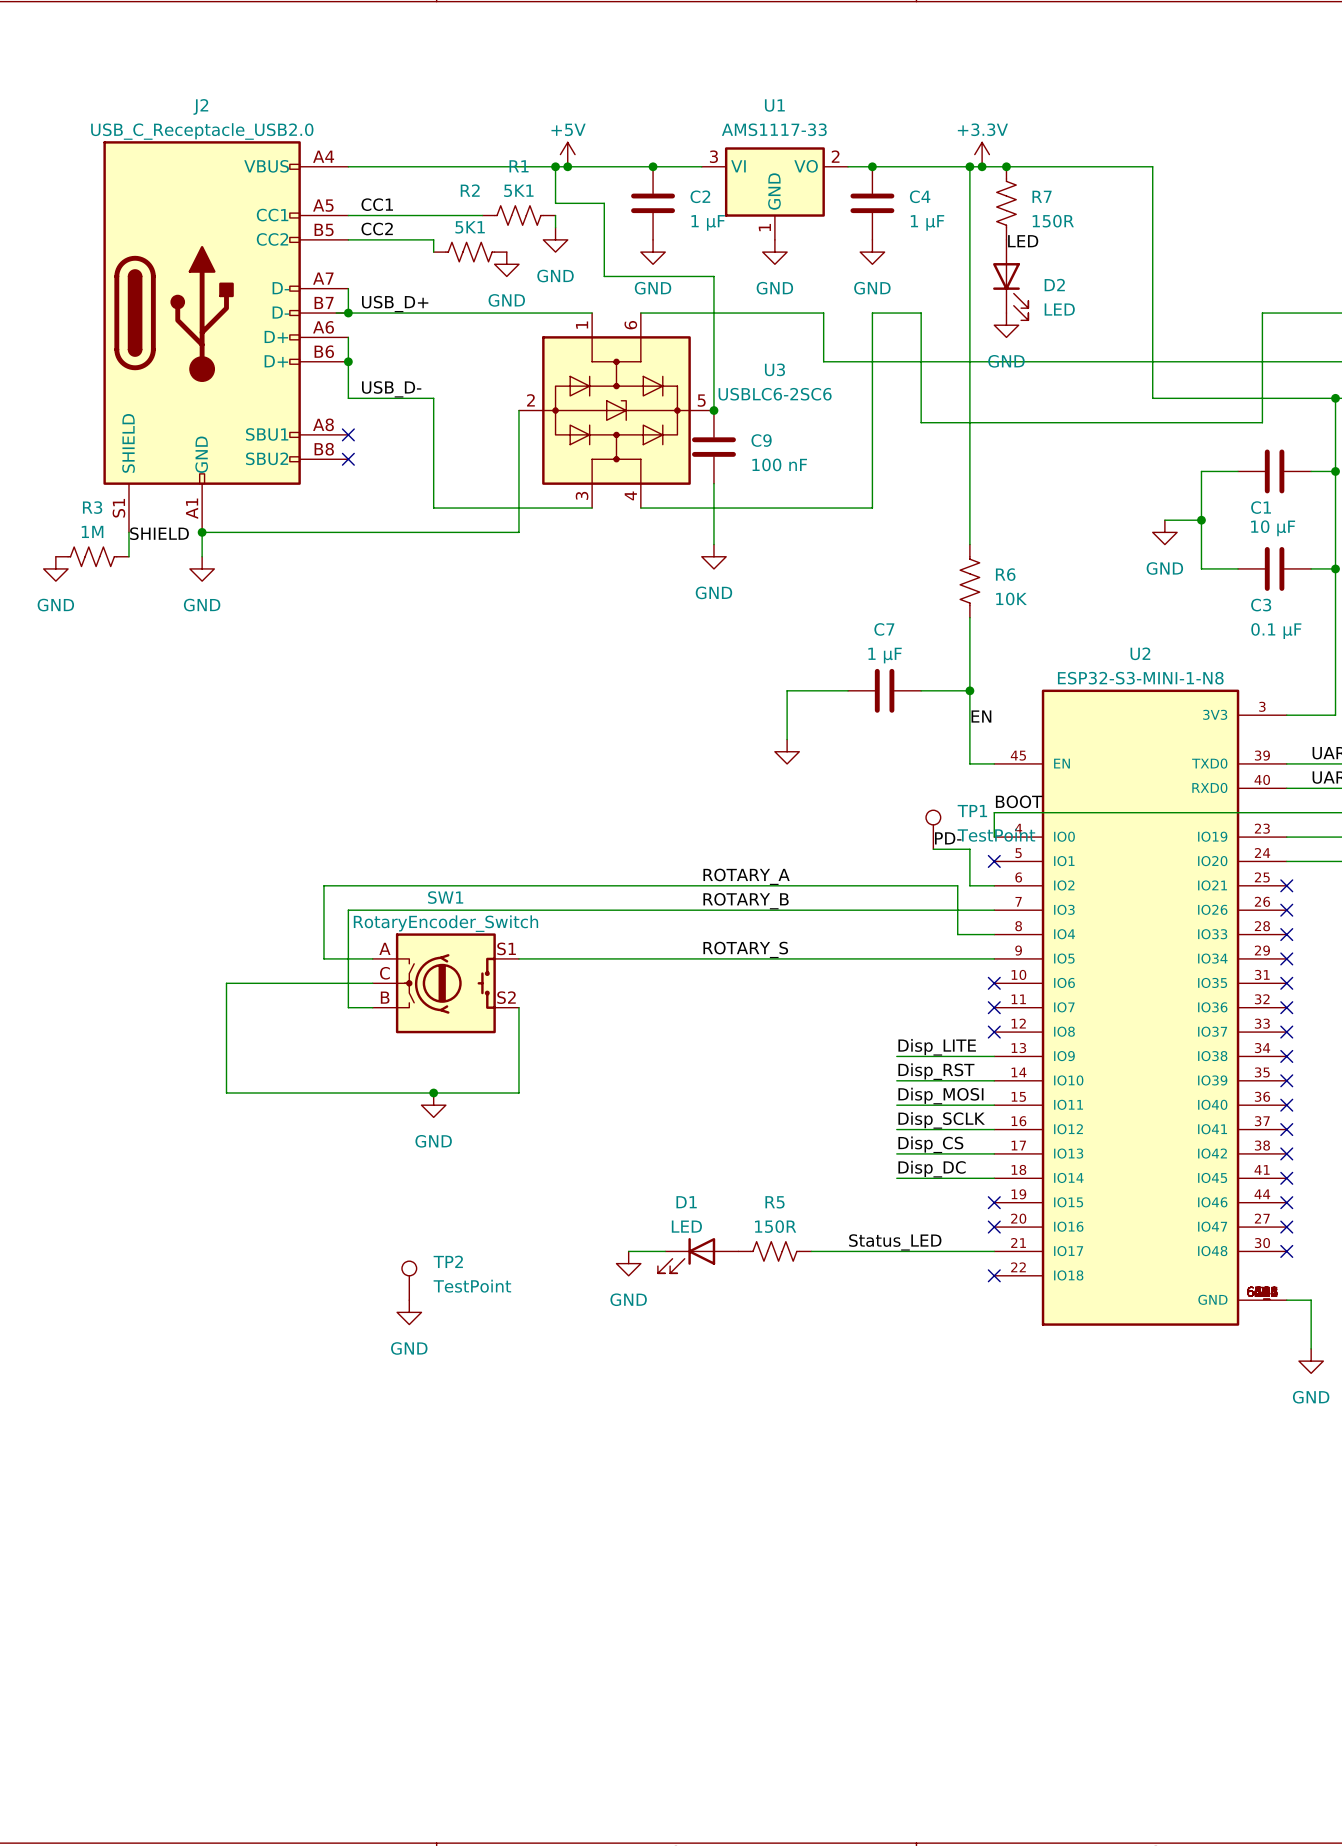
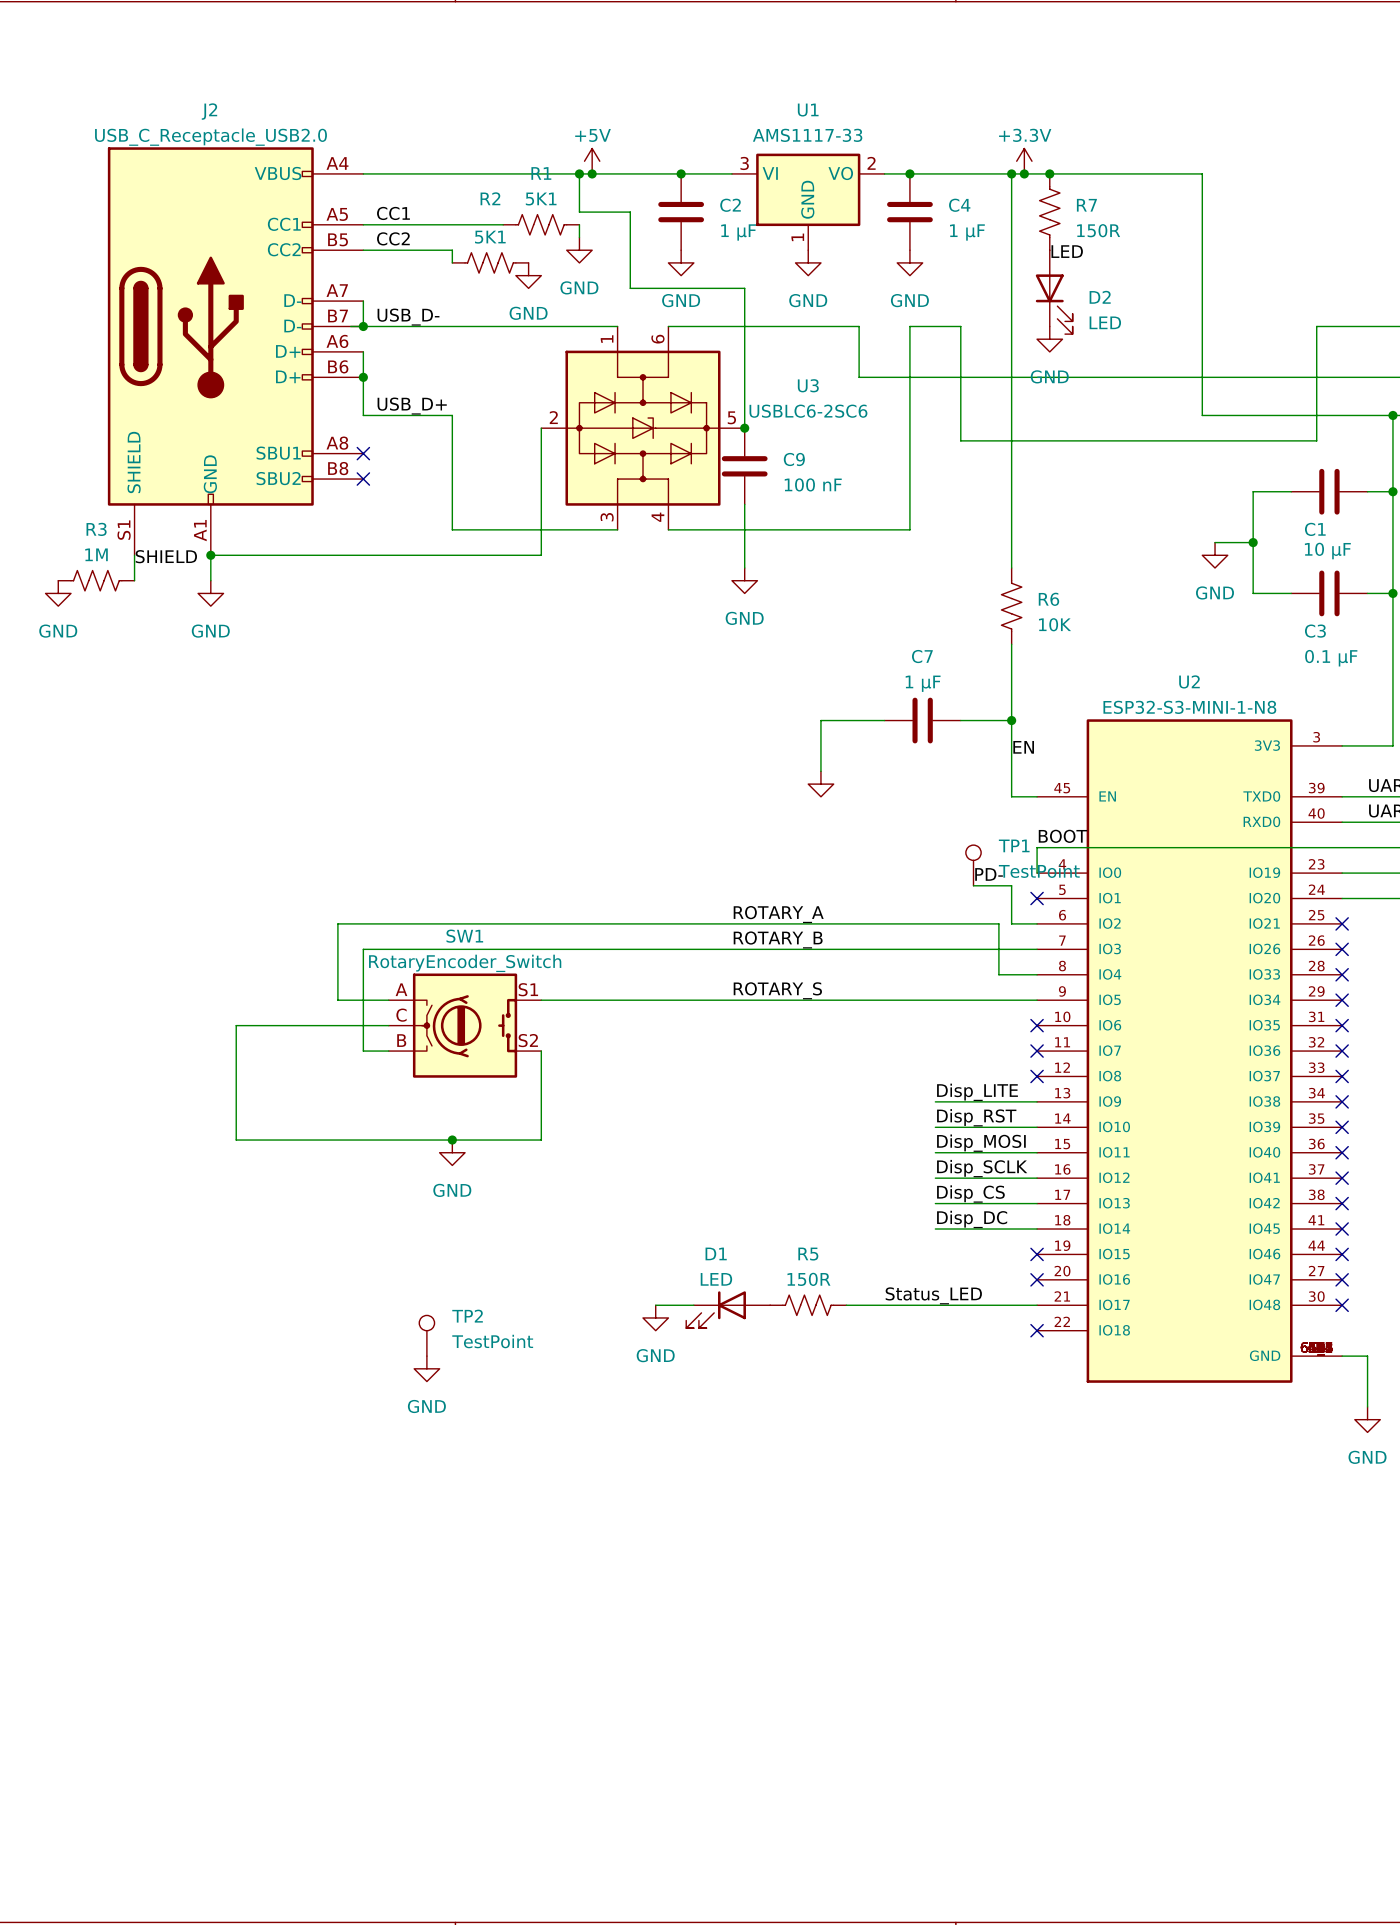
label: USB_D+ (395, 304) -> USB_D- (408, 317)
label: USB_D- (391, 389) -> USB_D+ (412, 406)

